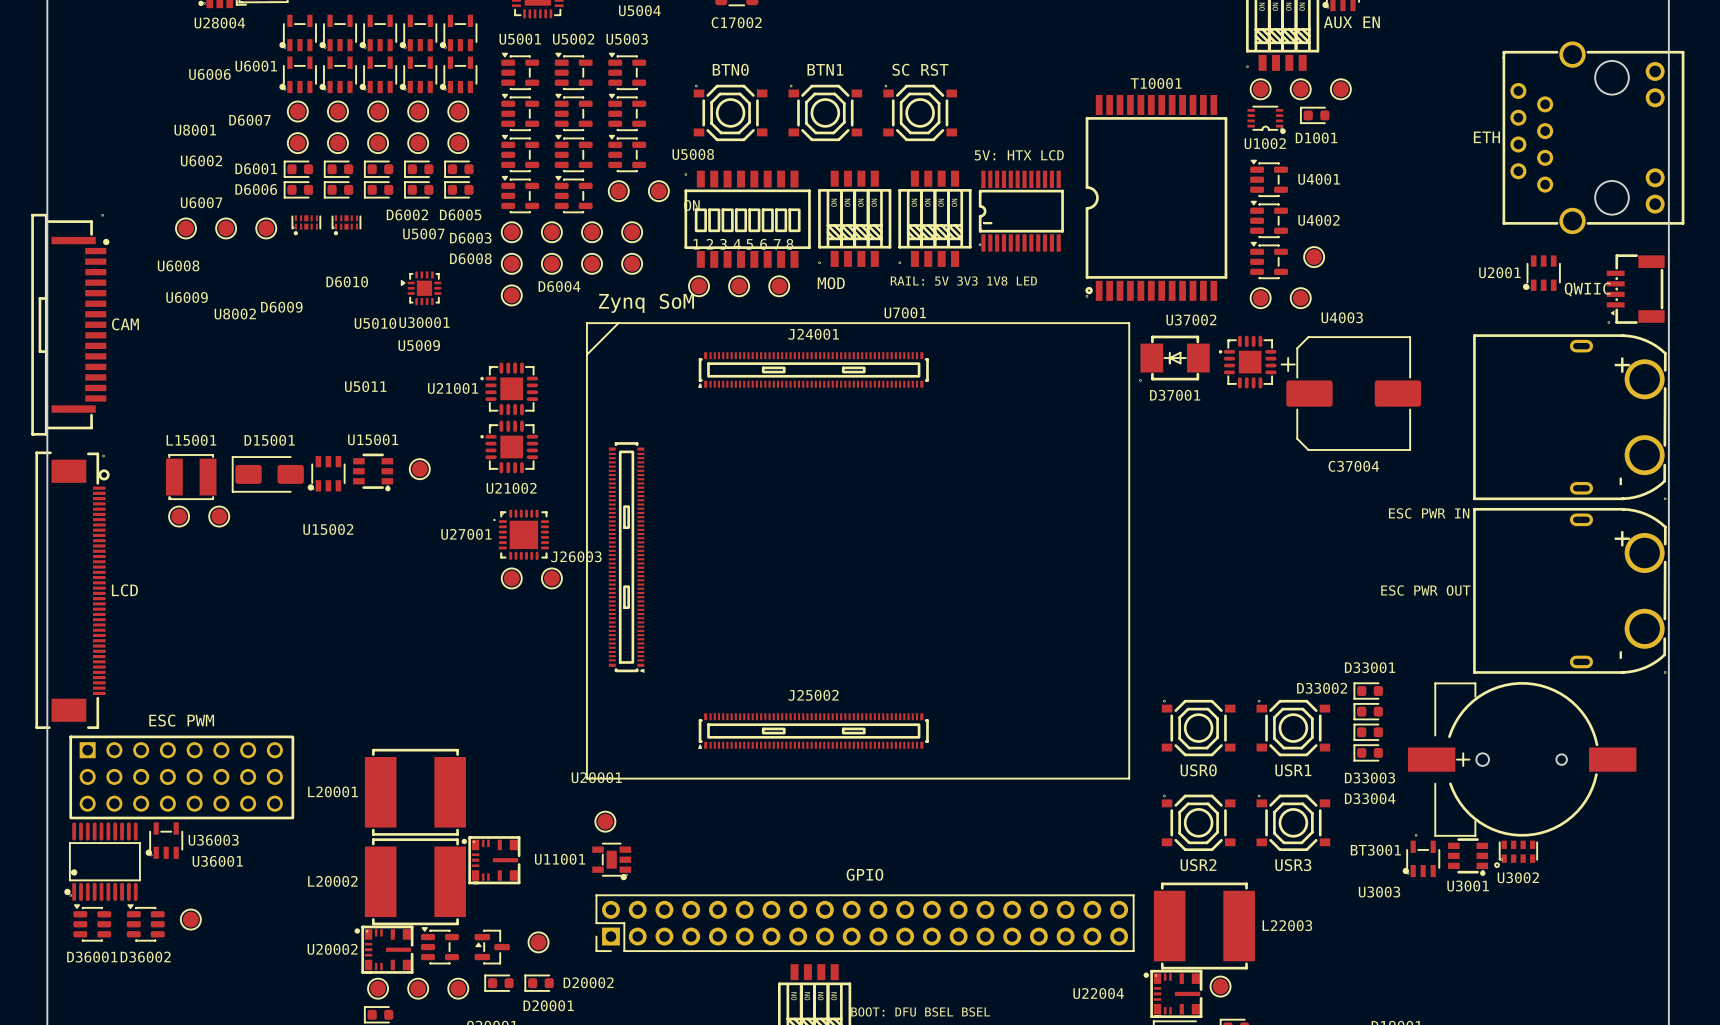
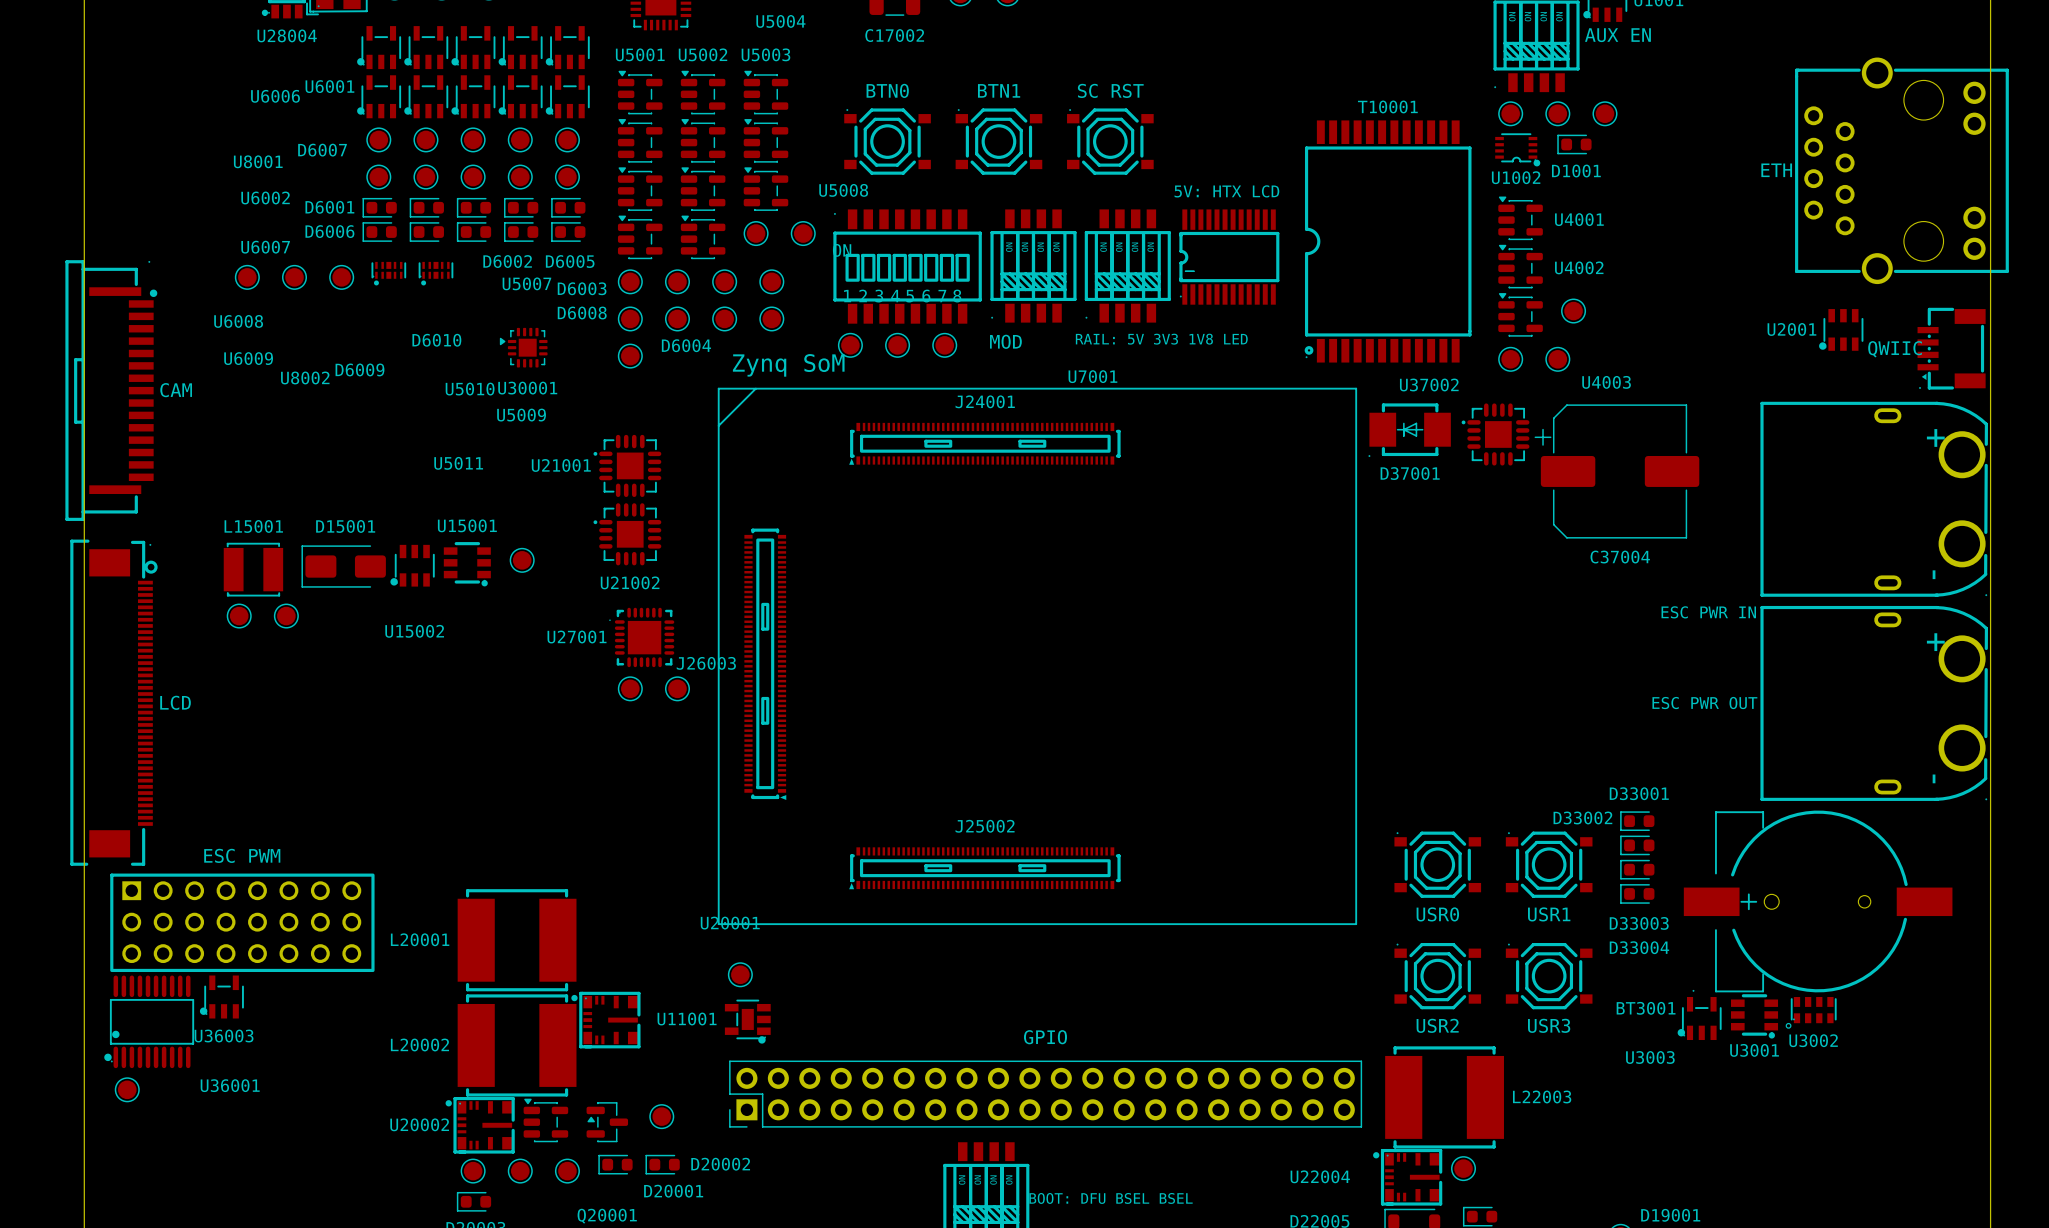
U36003 name position: U36003 (213, 840) -> U36003 (224, 1035)
U36001 name position: U36001 (217, 861) -> U36001 (230, 1085)
part position: (190, 919) -> (127, 1089)
D36001: (92, 922) -> none
D36002: (145, 922) -> none

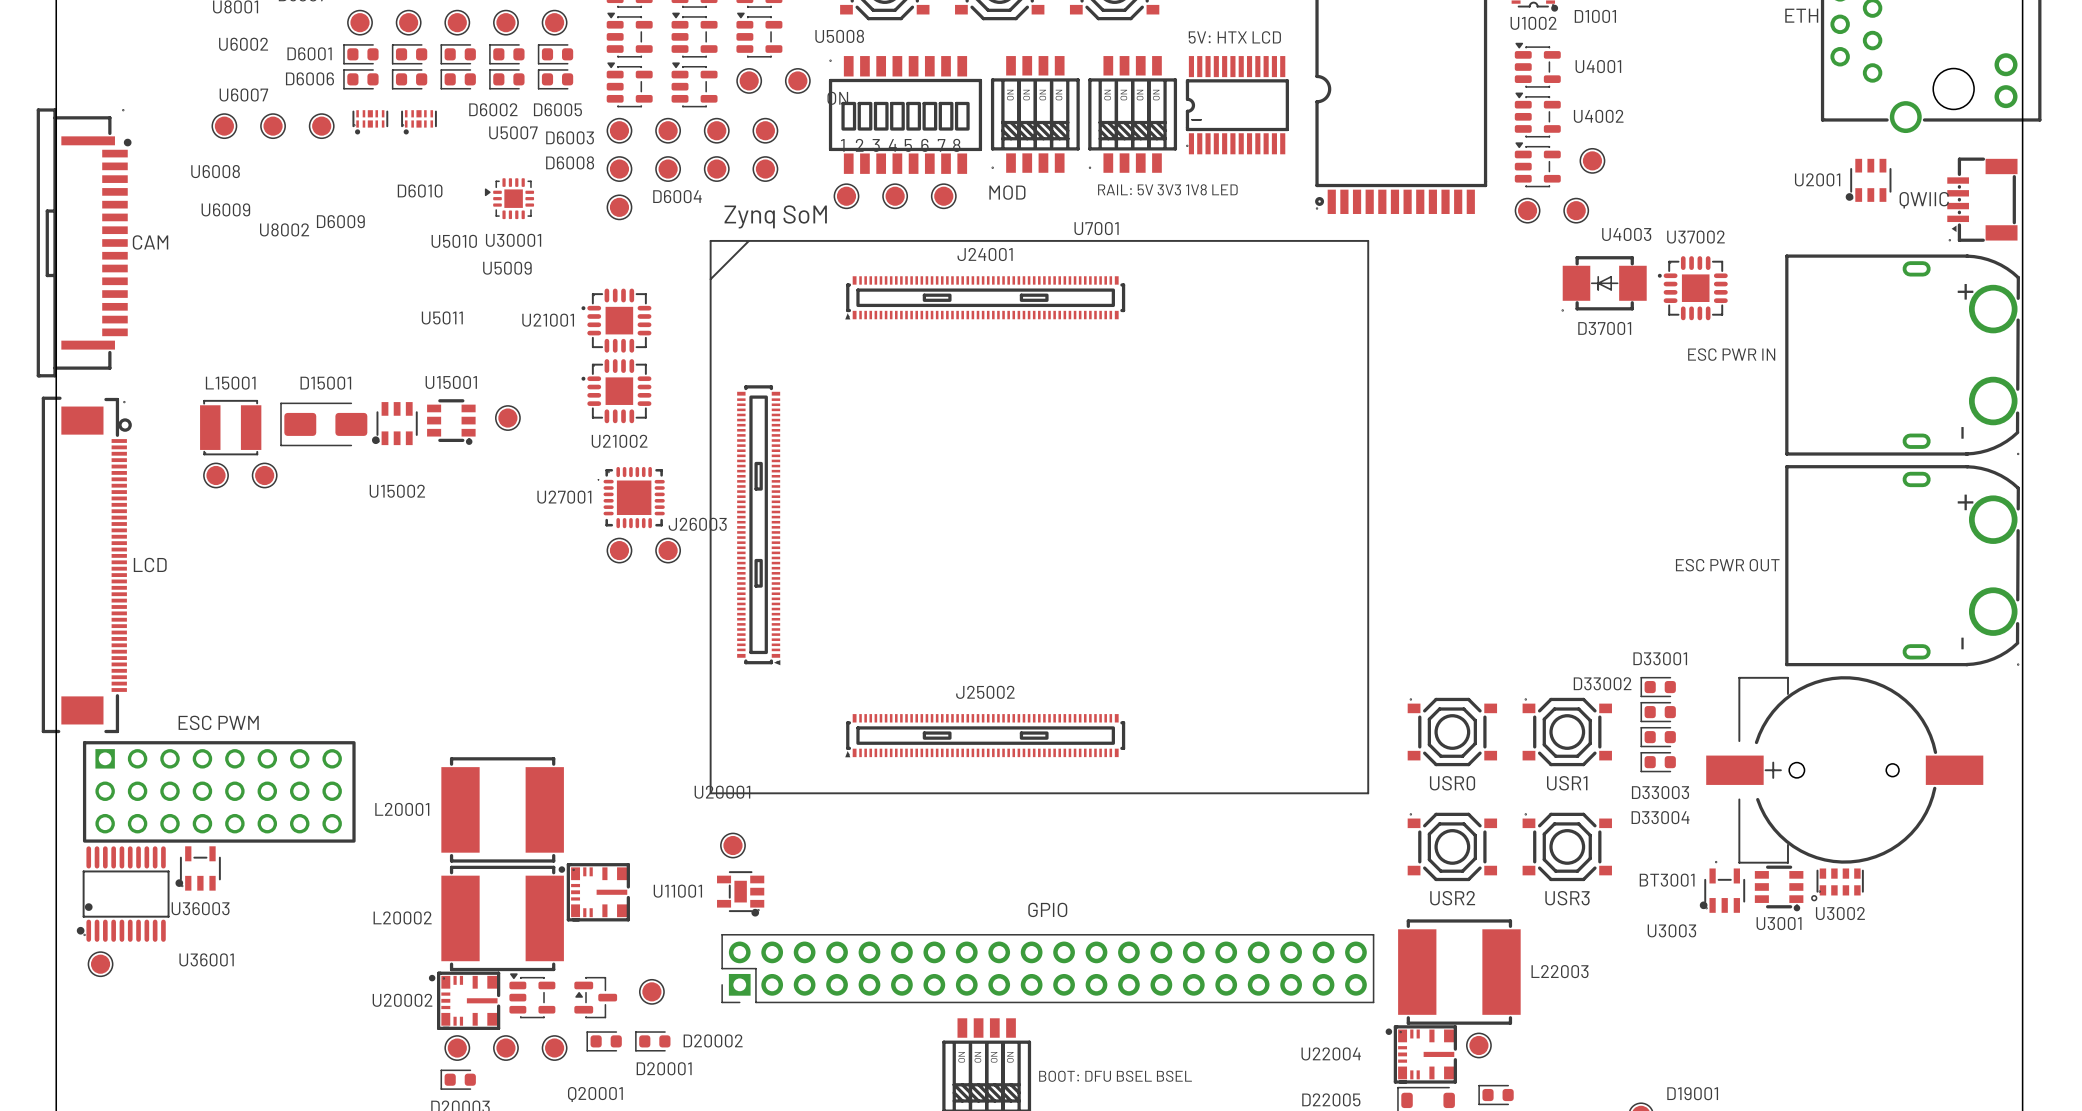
U37002 name position: U37002 (1429, 384) -> U37002 (1695, 237)
D37001 position: (1409, 430) -> (1604, 283)
U37002 position: (1495, 434) -> (1692, 288)
C37004: (1616, 471) -> none
text position: ESC PWR IN (1708, 612) -> ESC PWR IN (1731, 354)

